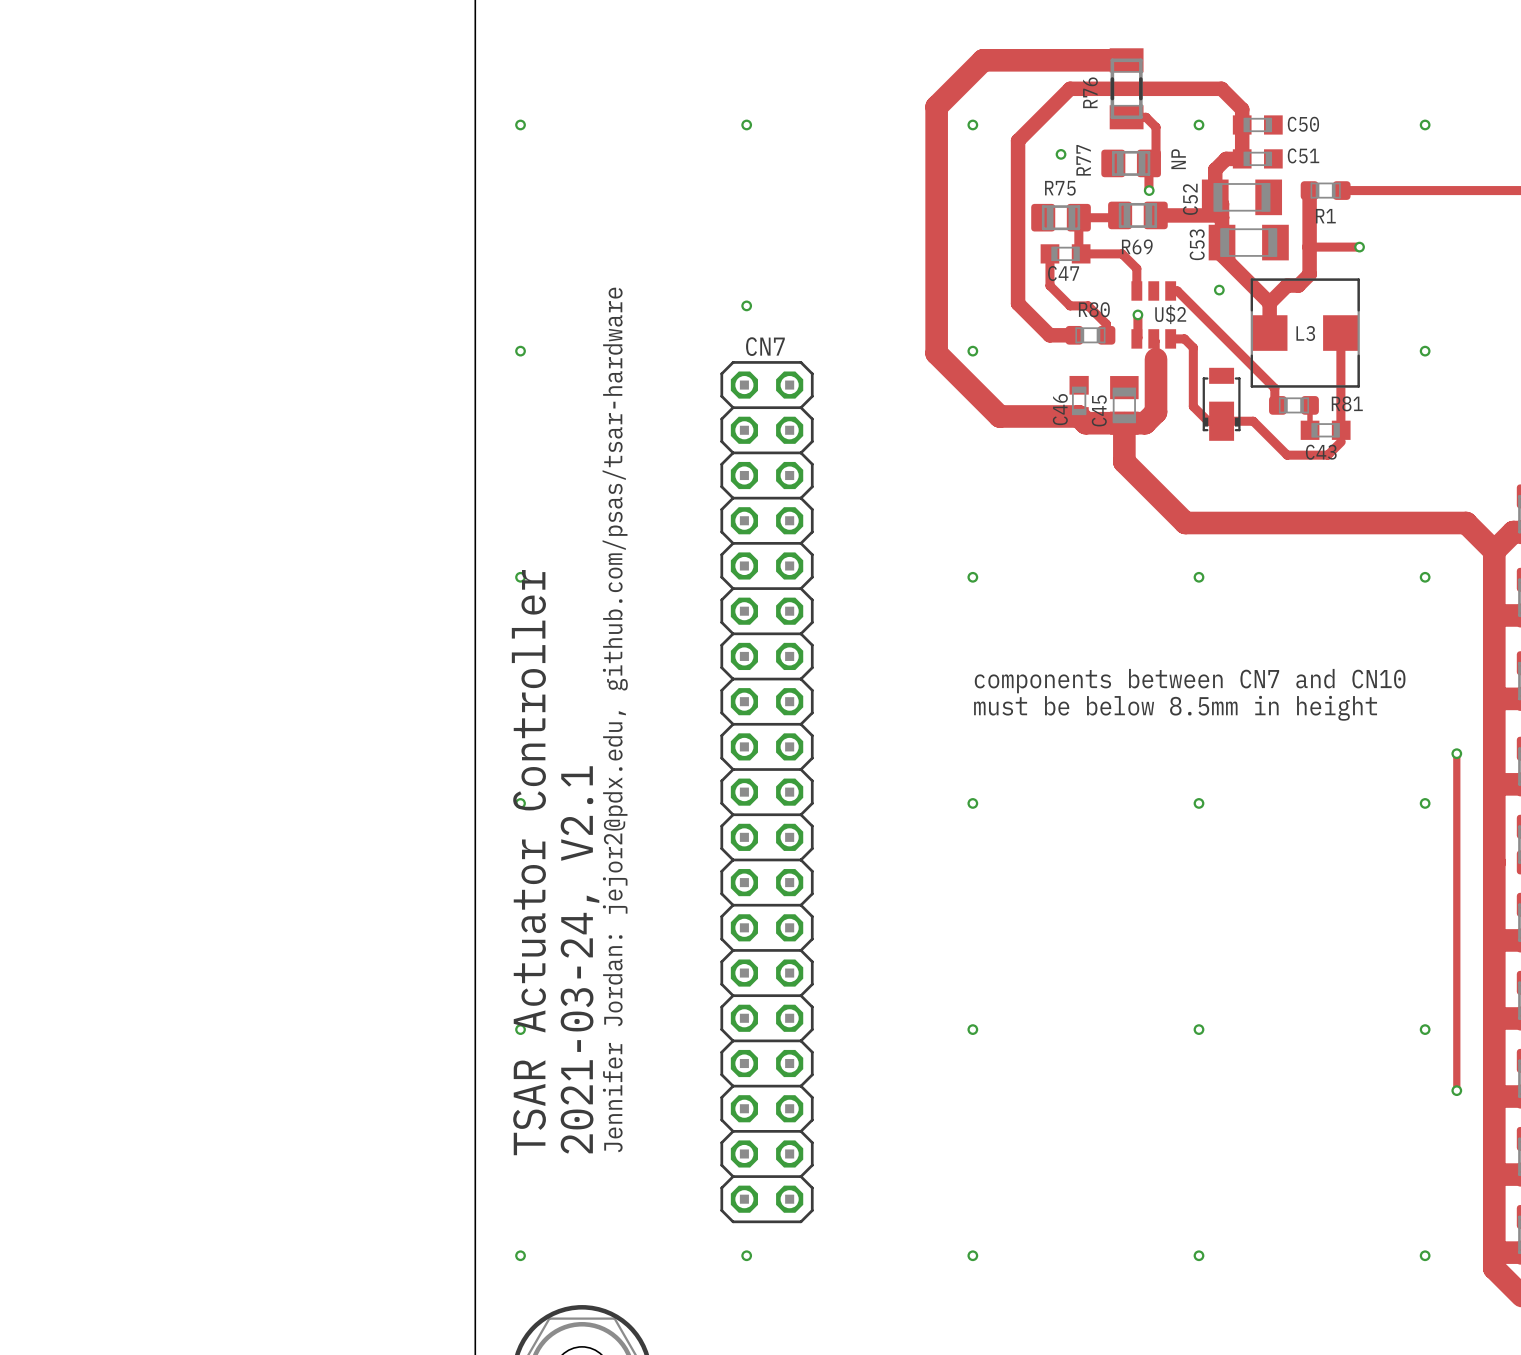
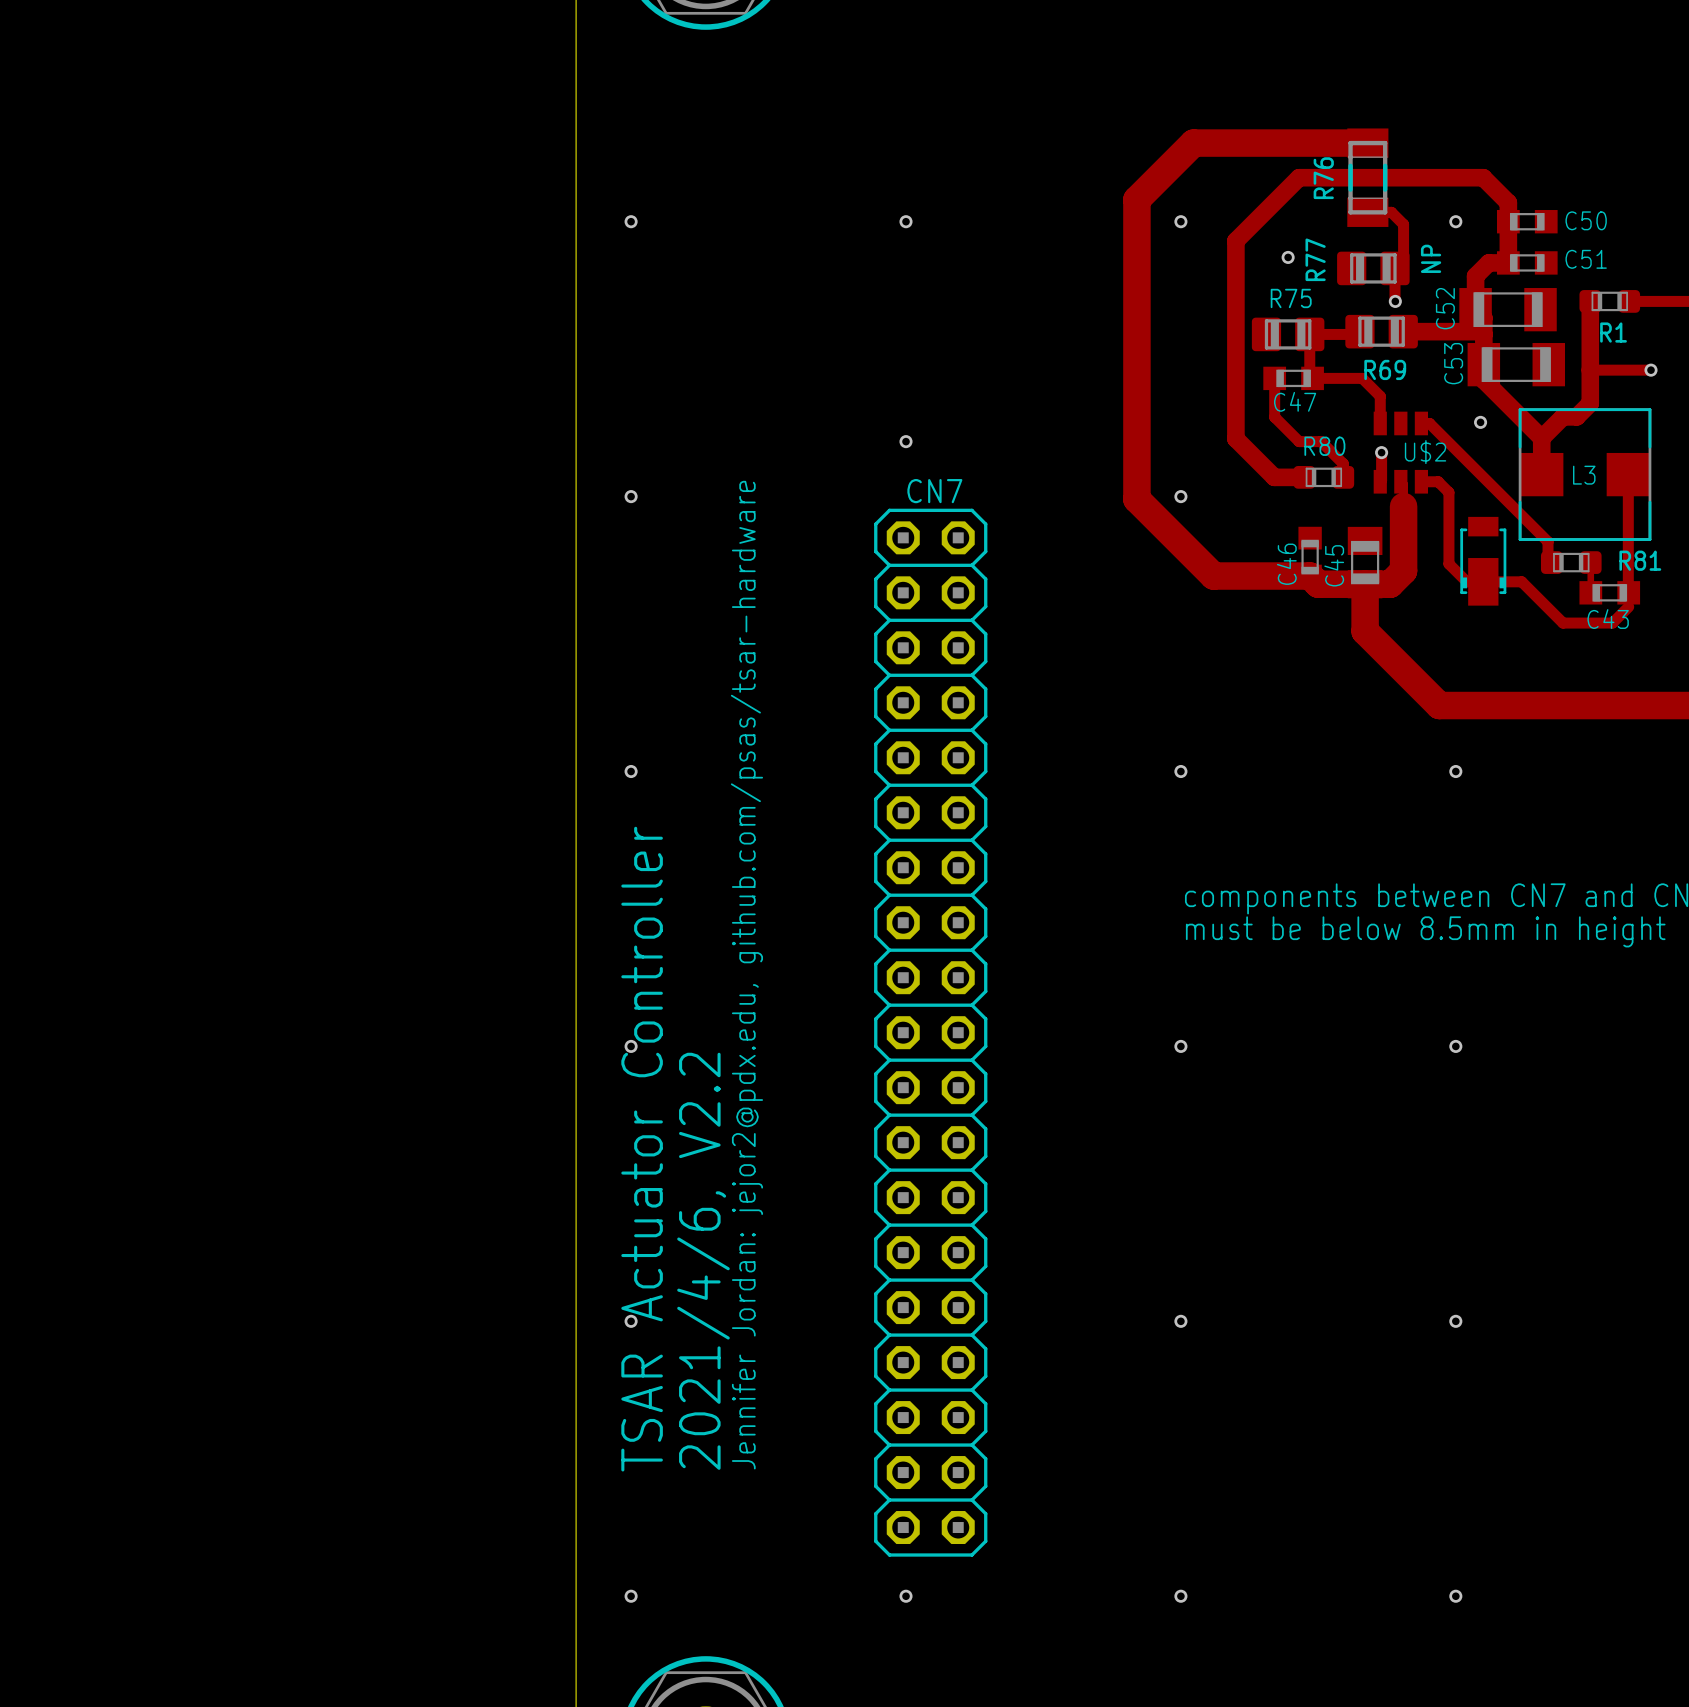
text: 2021-03-24, V2.1 (579, 959) -> 2021/4/6, V2.2 (703, 1261)

